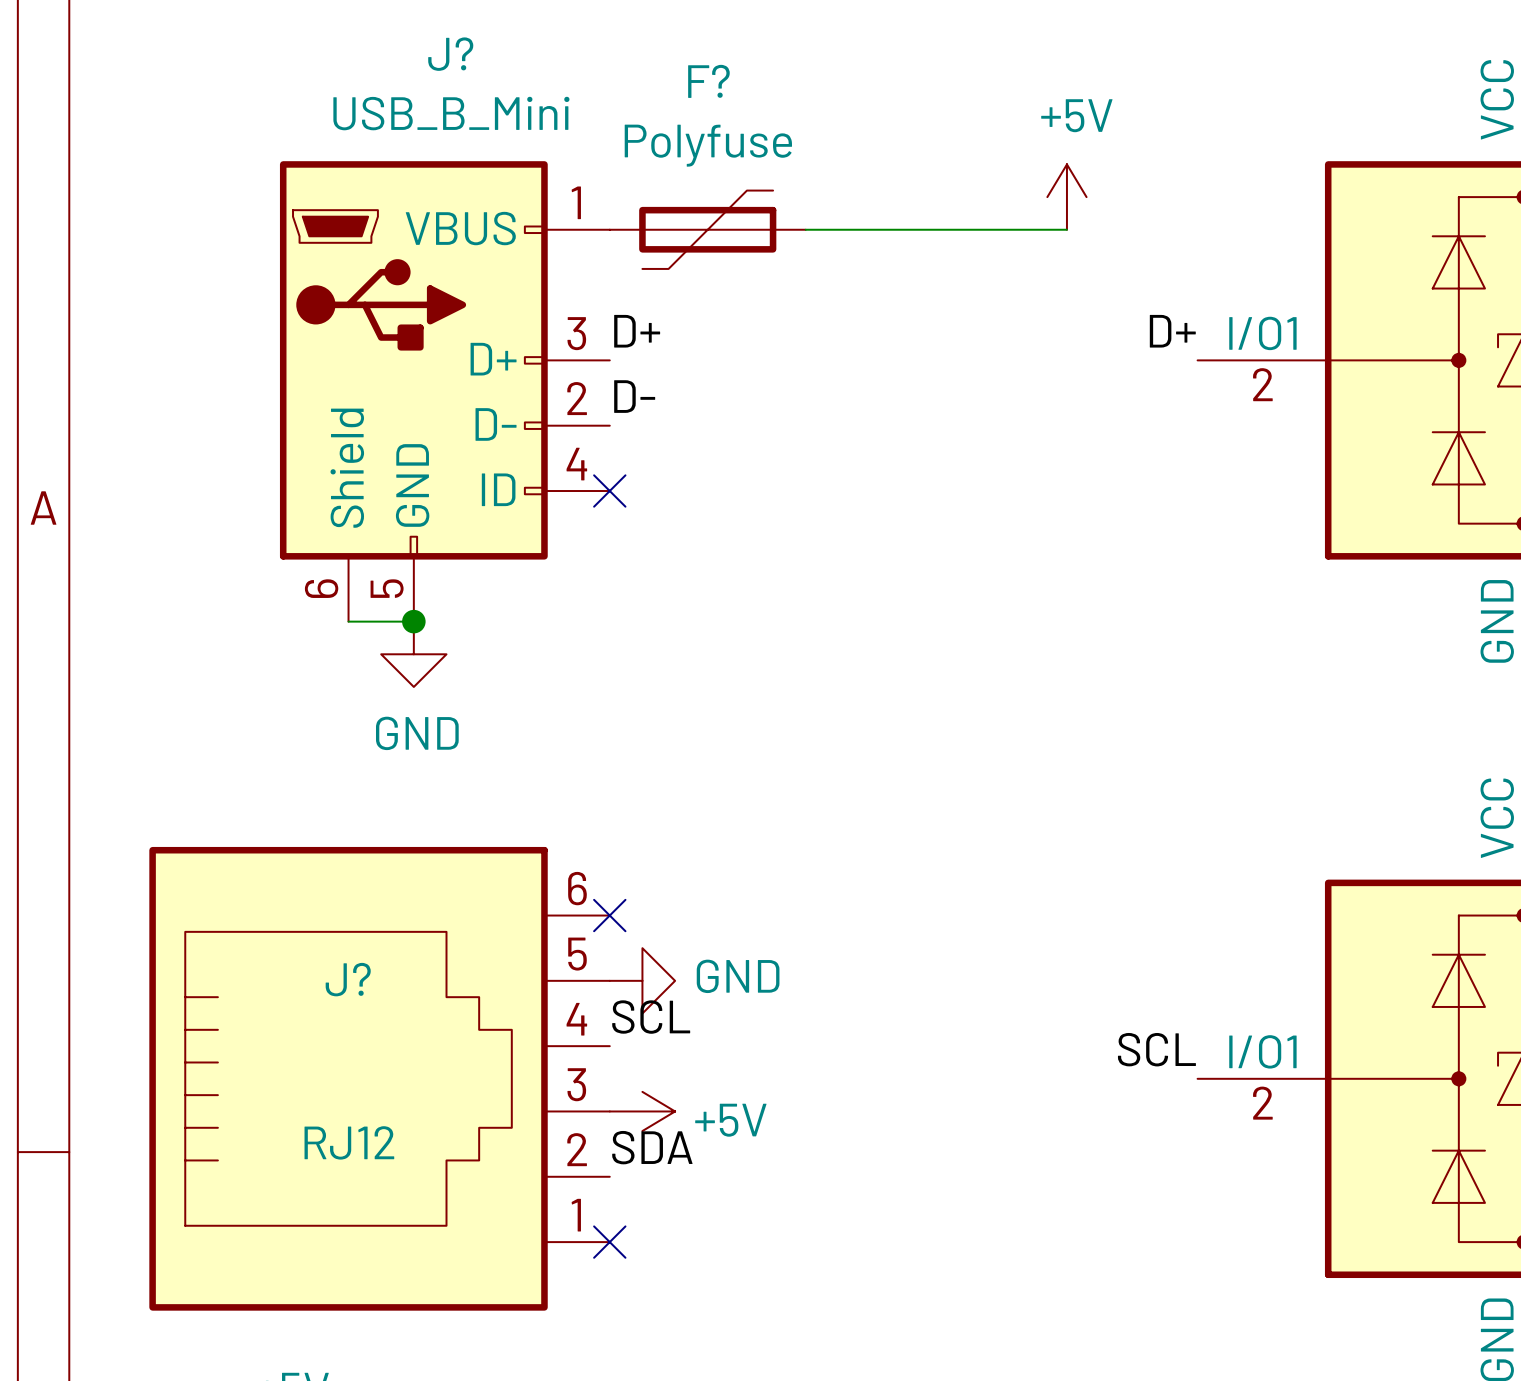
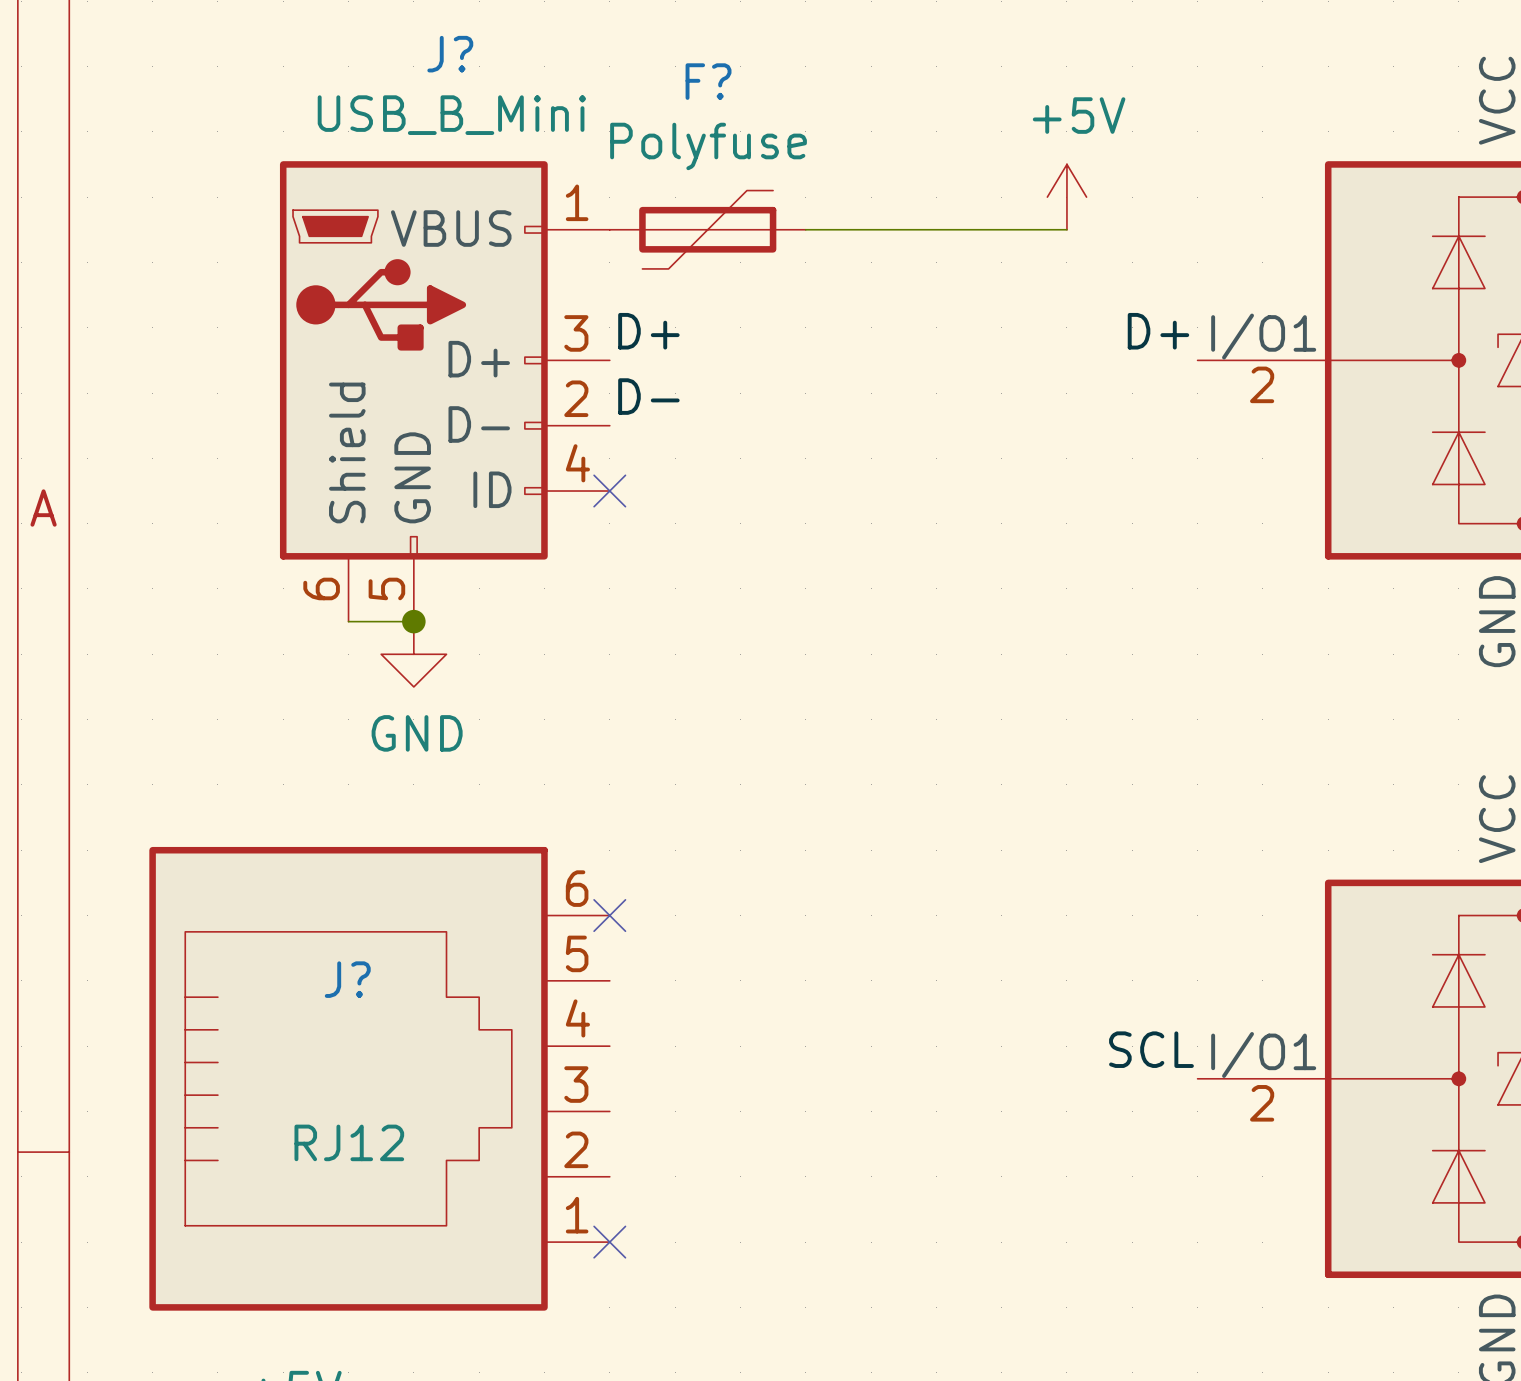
power symbol: GND (642, 980) -> none
label: SCL (651, 1017) -> none
power symbol: +5V (642, 1111) -> none
label: SDA (652, 1147) -> none

